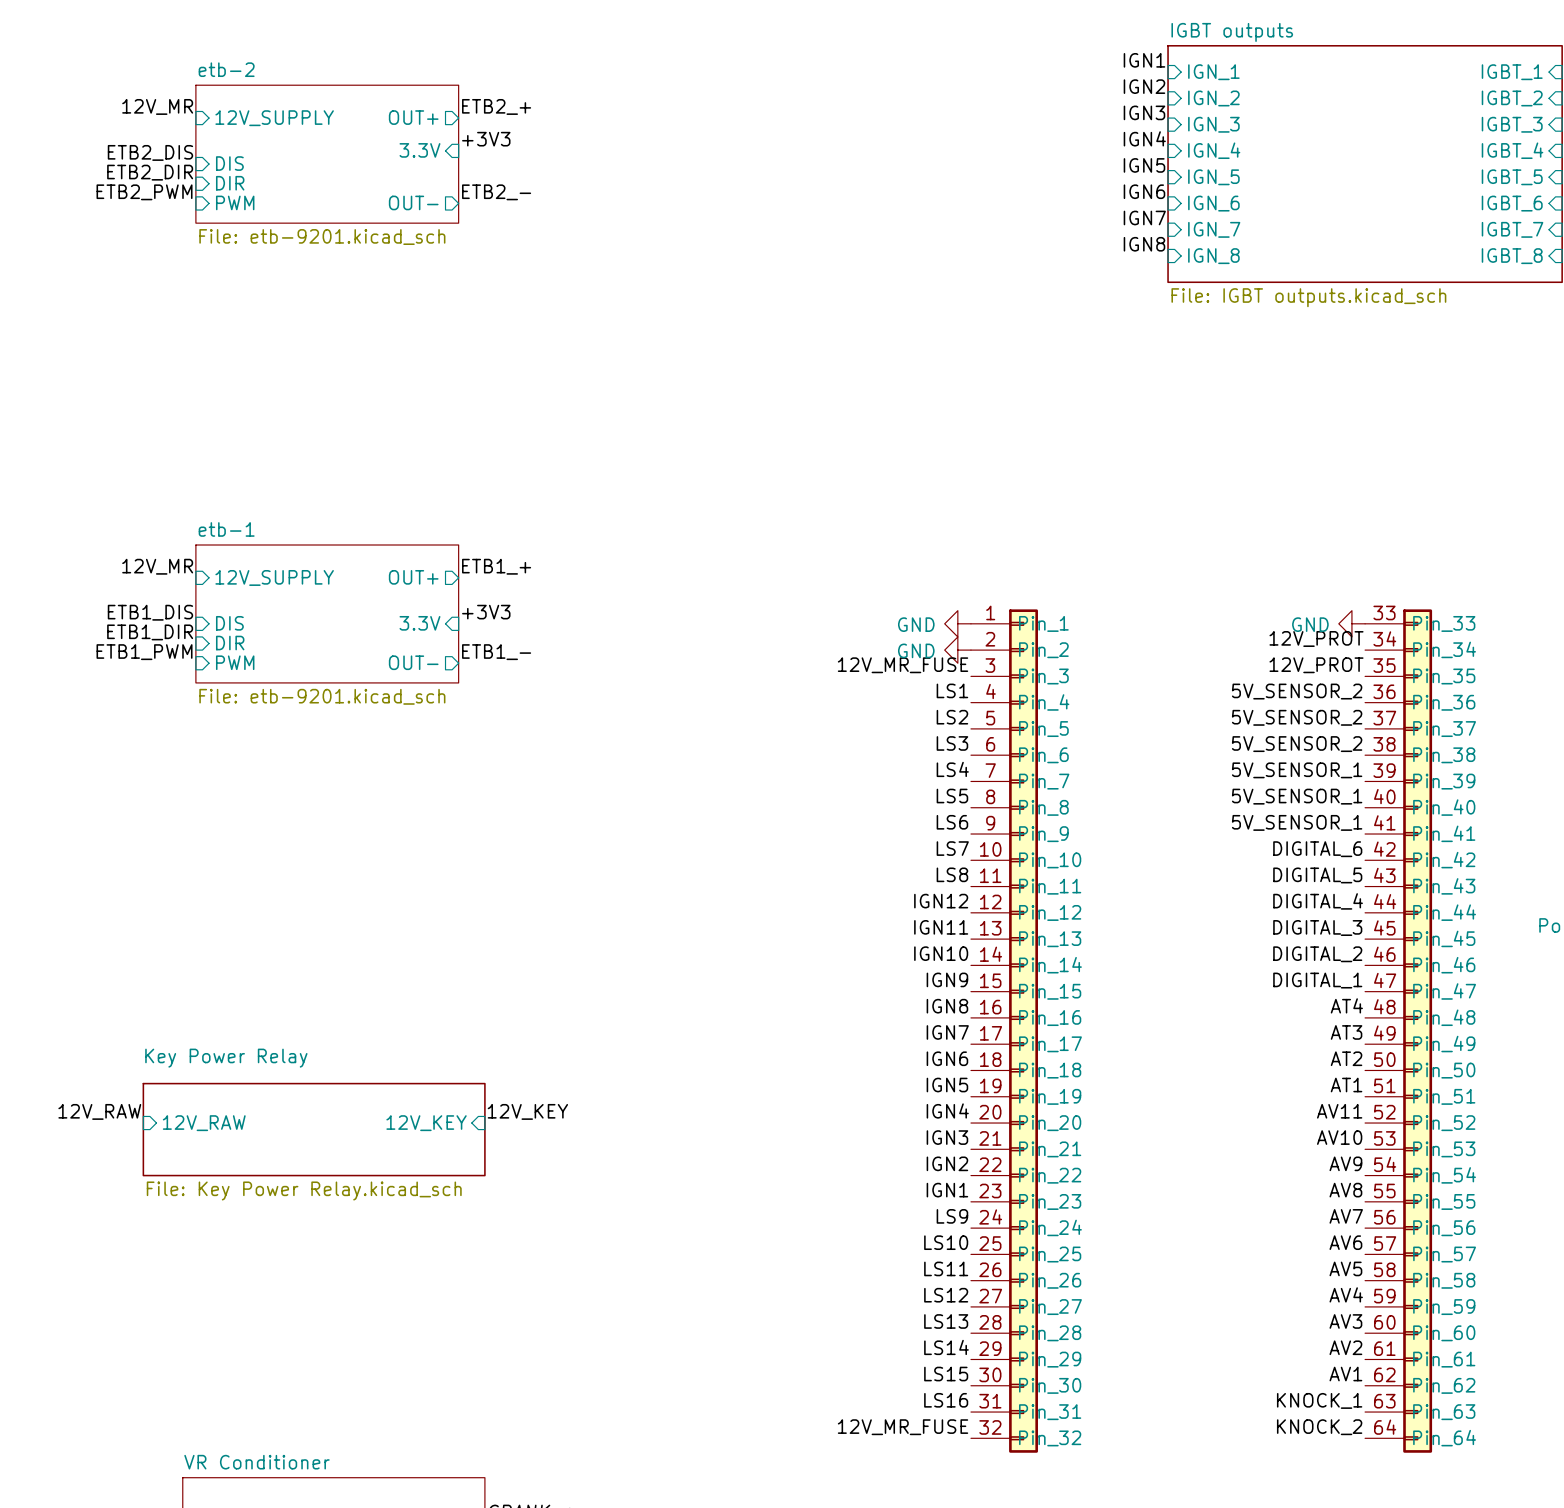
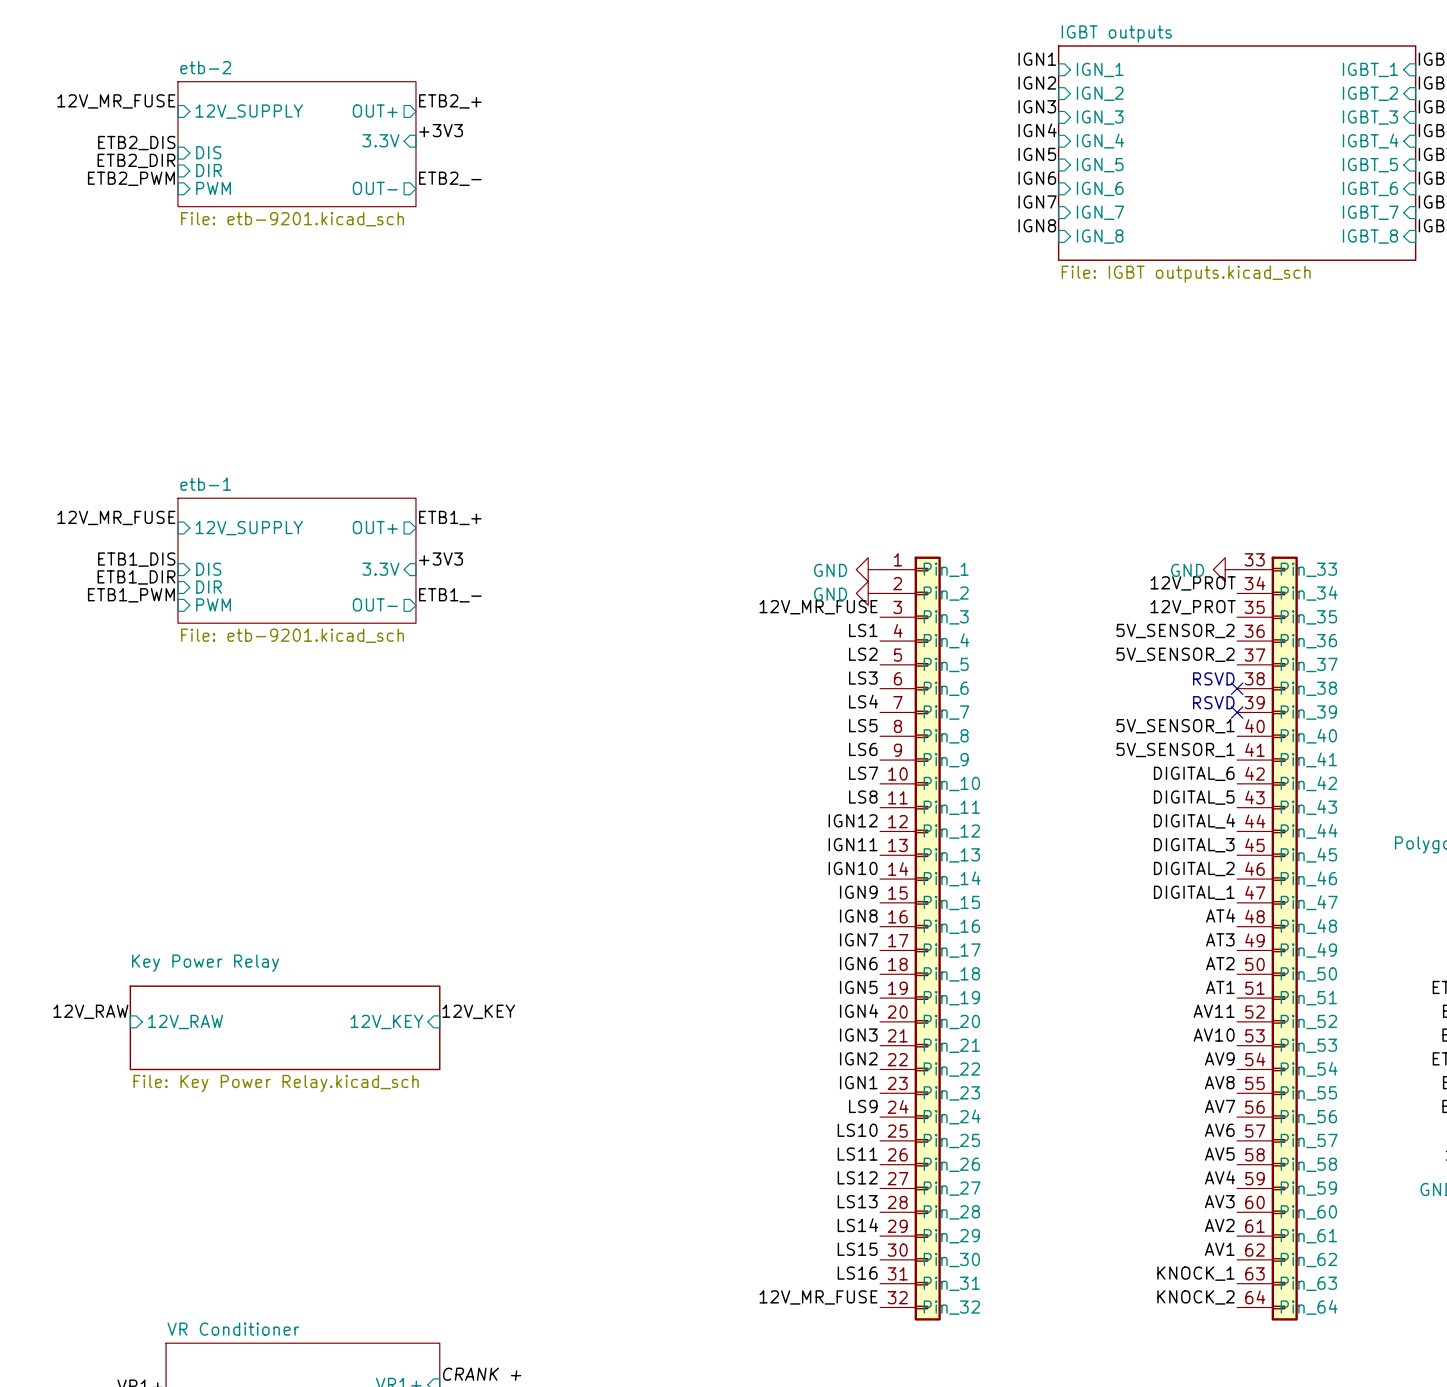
label: 12V_MR (157, 106) -> 12V_MR_FUSE (116, 101)
label: 12V_MR (157, 566) -> 12V_MR_FUSE (116, 517)
label: 5V_SENSOR_2 (1297, 744) -> none
text: none -> RSVD (1213, 678)
no-connect mark: none -> (1237, 688)
label: 5V_SENSOR_1 (1297, 770) -> none
text: none -> RSVD (1213, 702)
no-connect mark: none -> (1237, 712)

